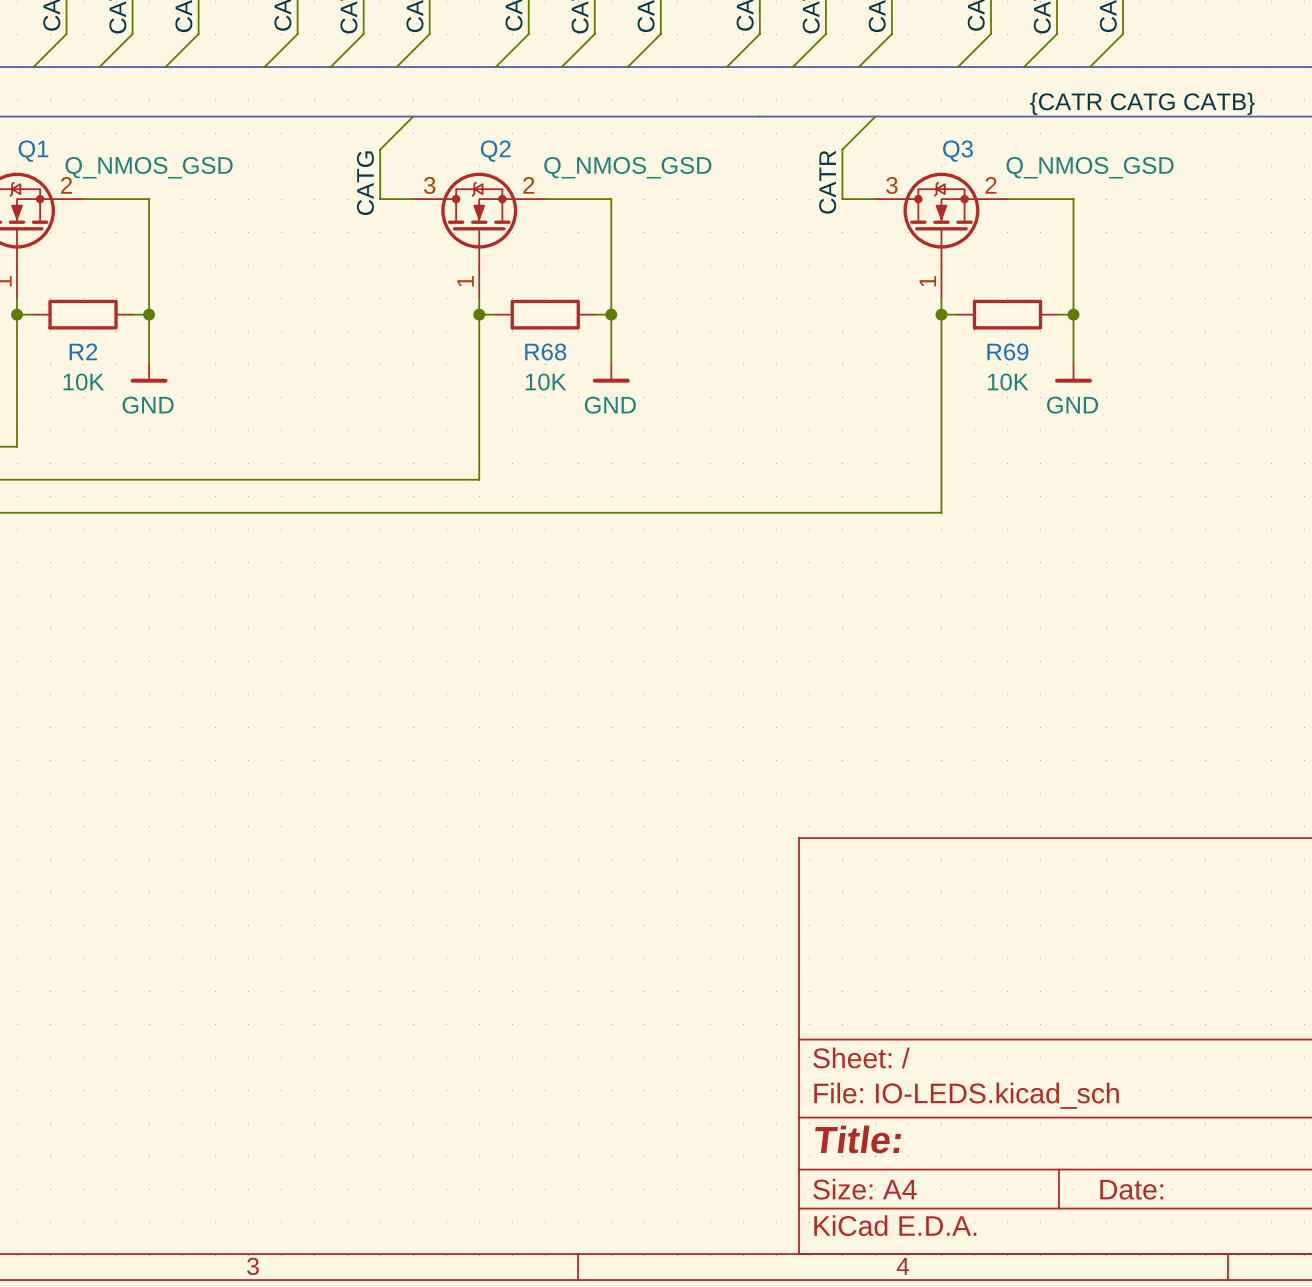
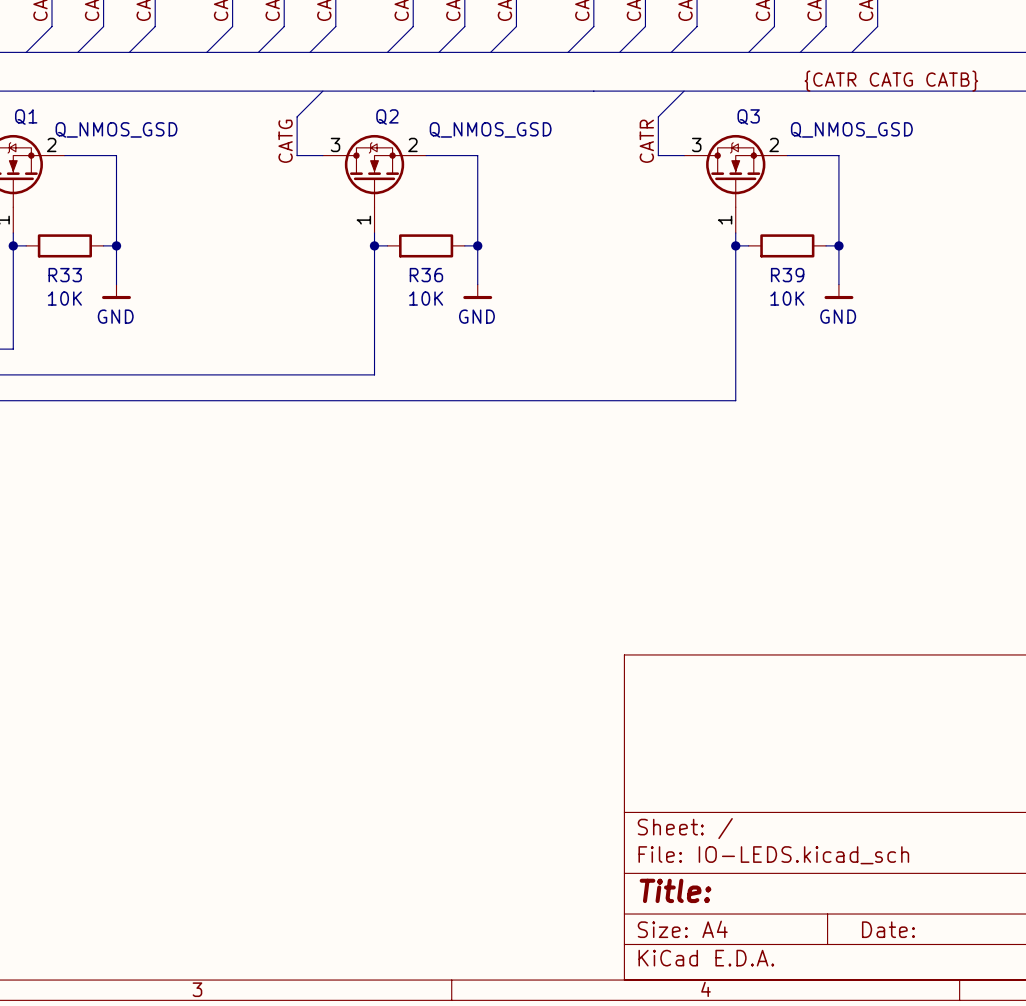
R2 name: R2 (83, 351) -> R33 (65, 275)
R68 name: R68 (545, 352) -> R36 (426, 275)
R69 name: R69 (1007, 352) -> R39 (787, 275)

